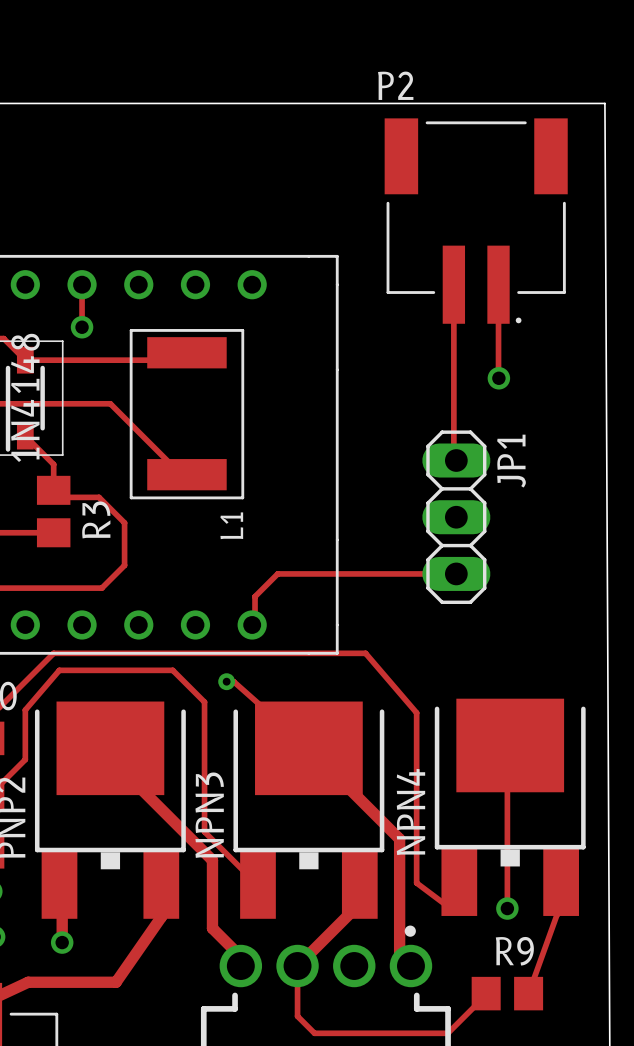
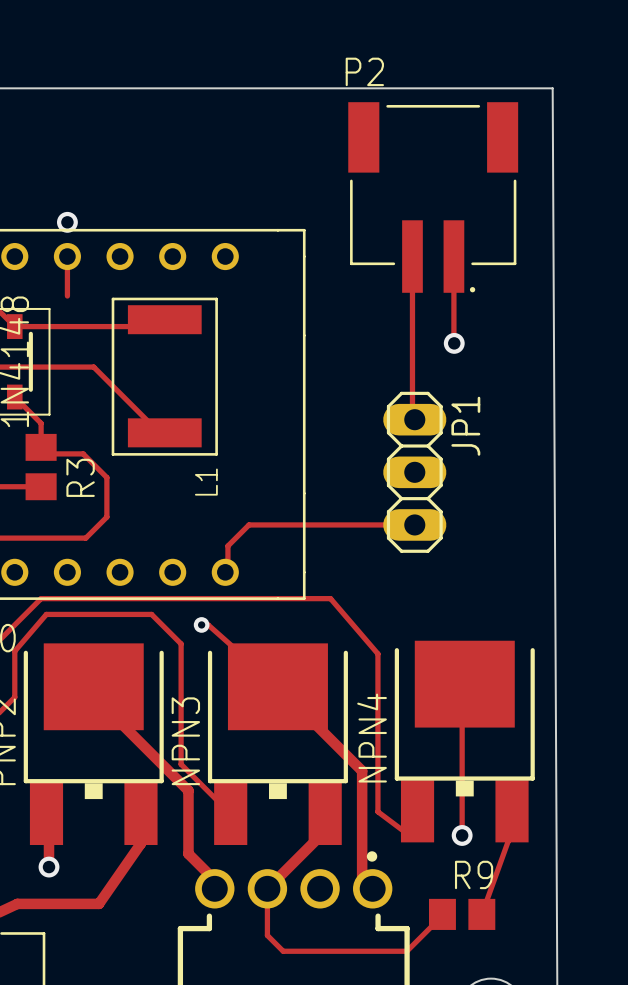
via position: (82, 327) -> (67, 222)

